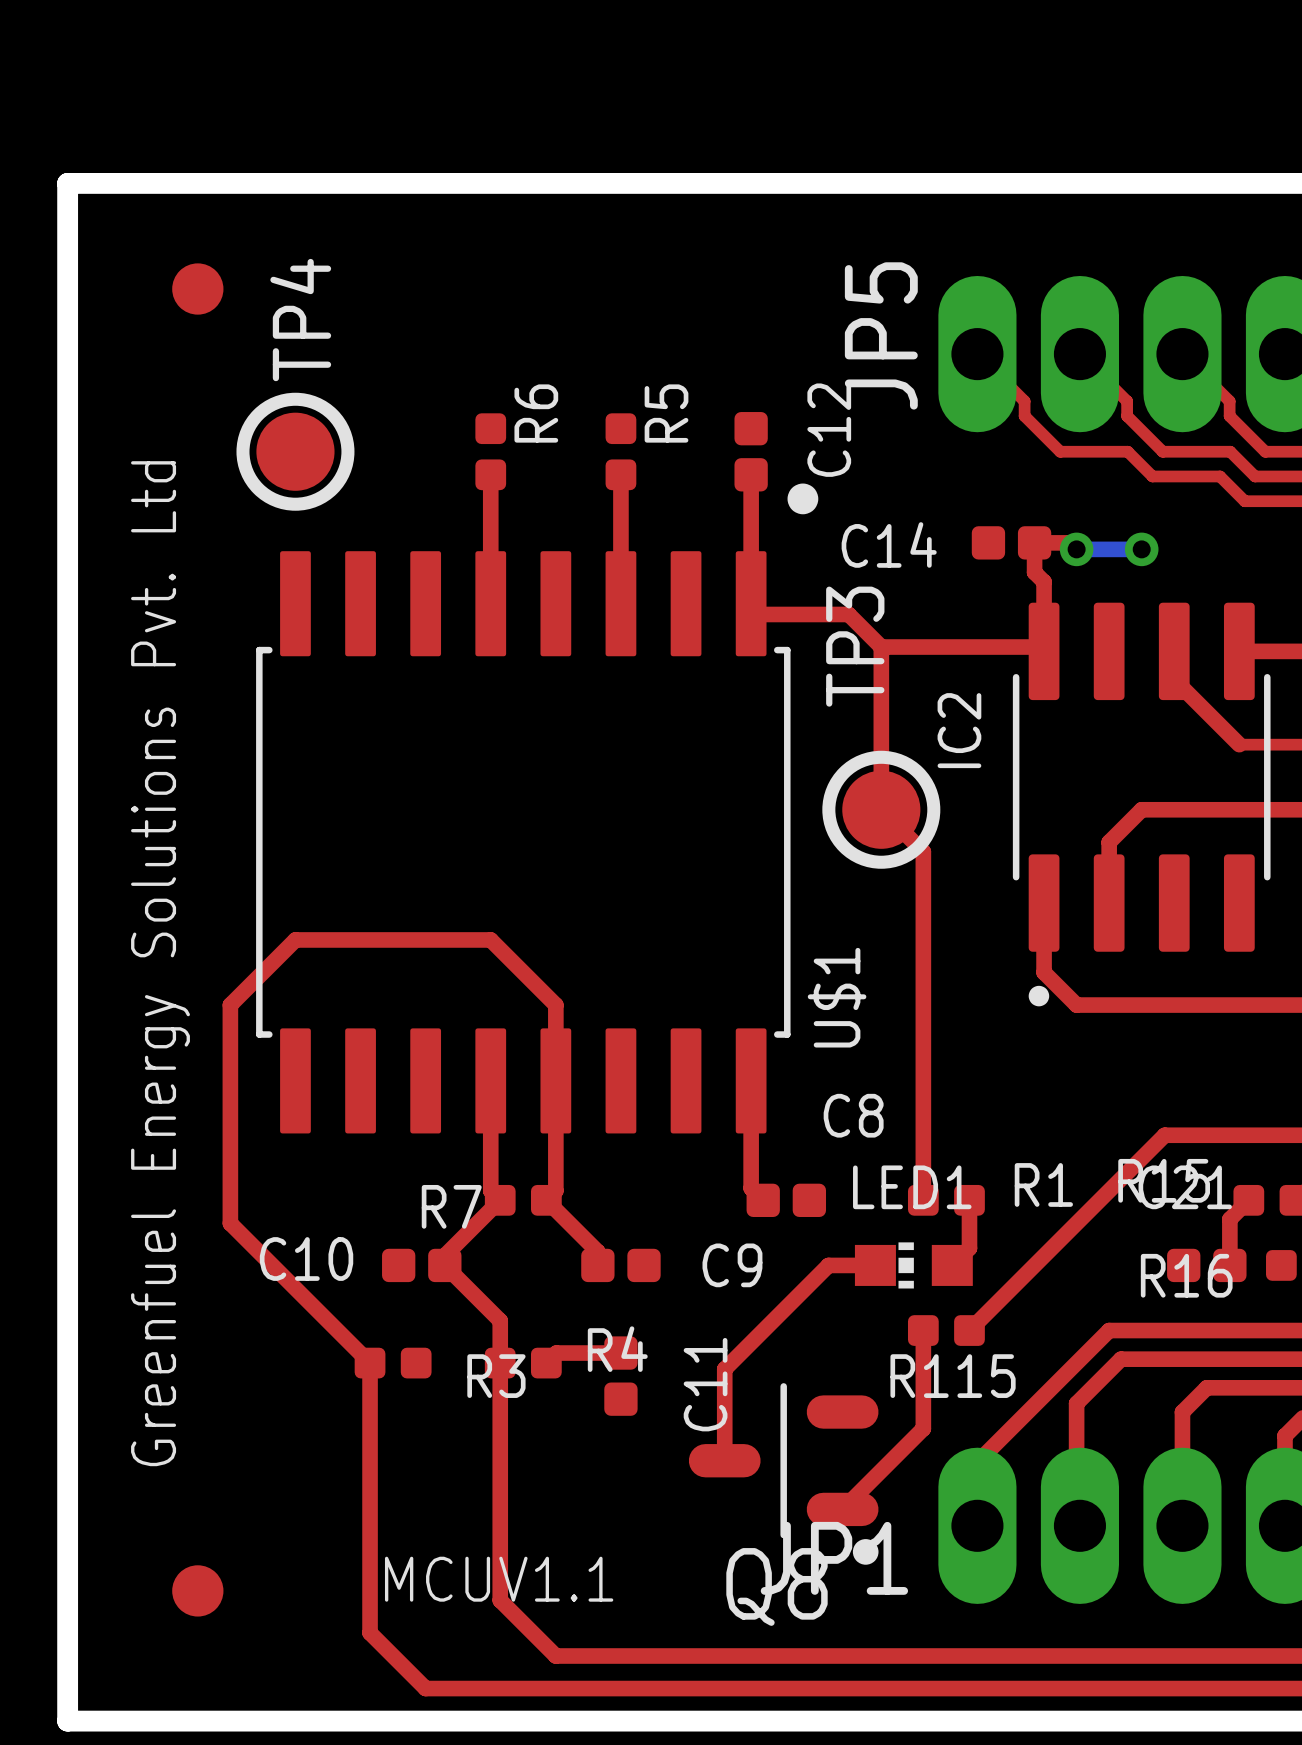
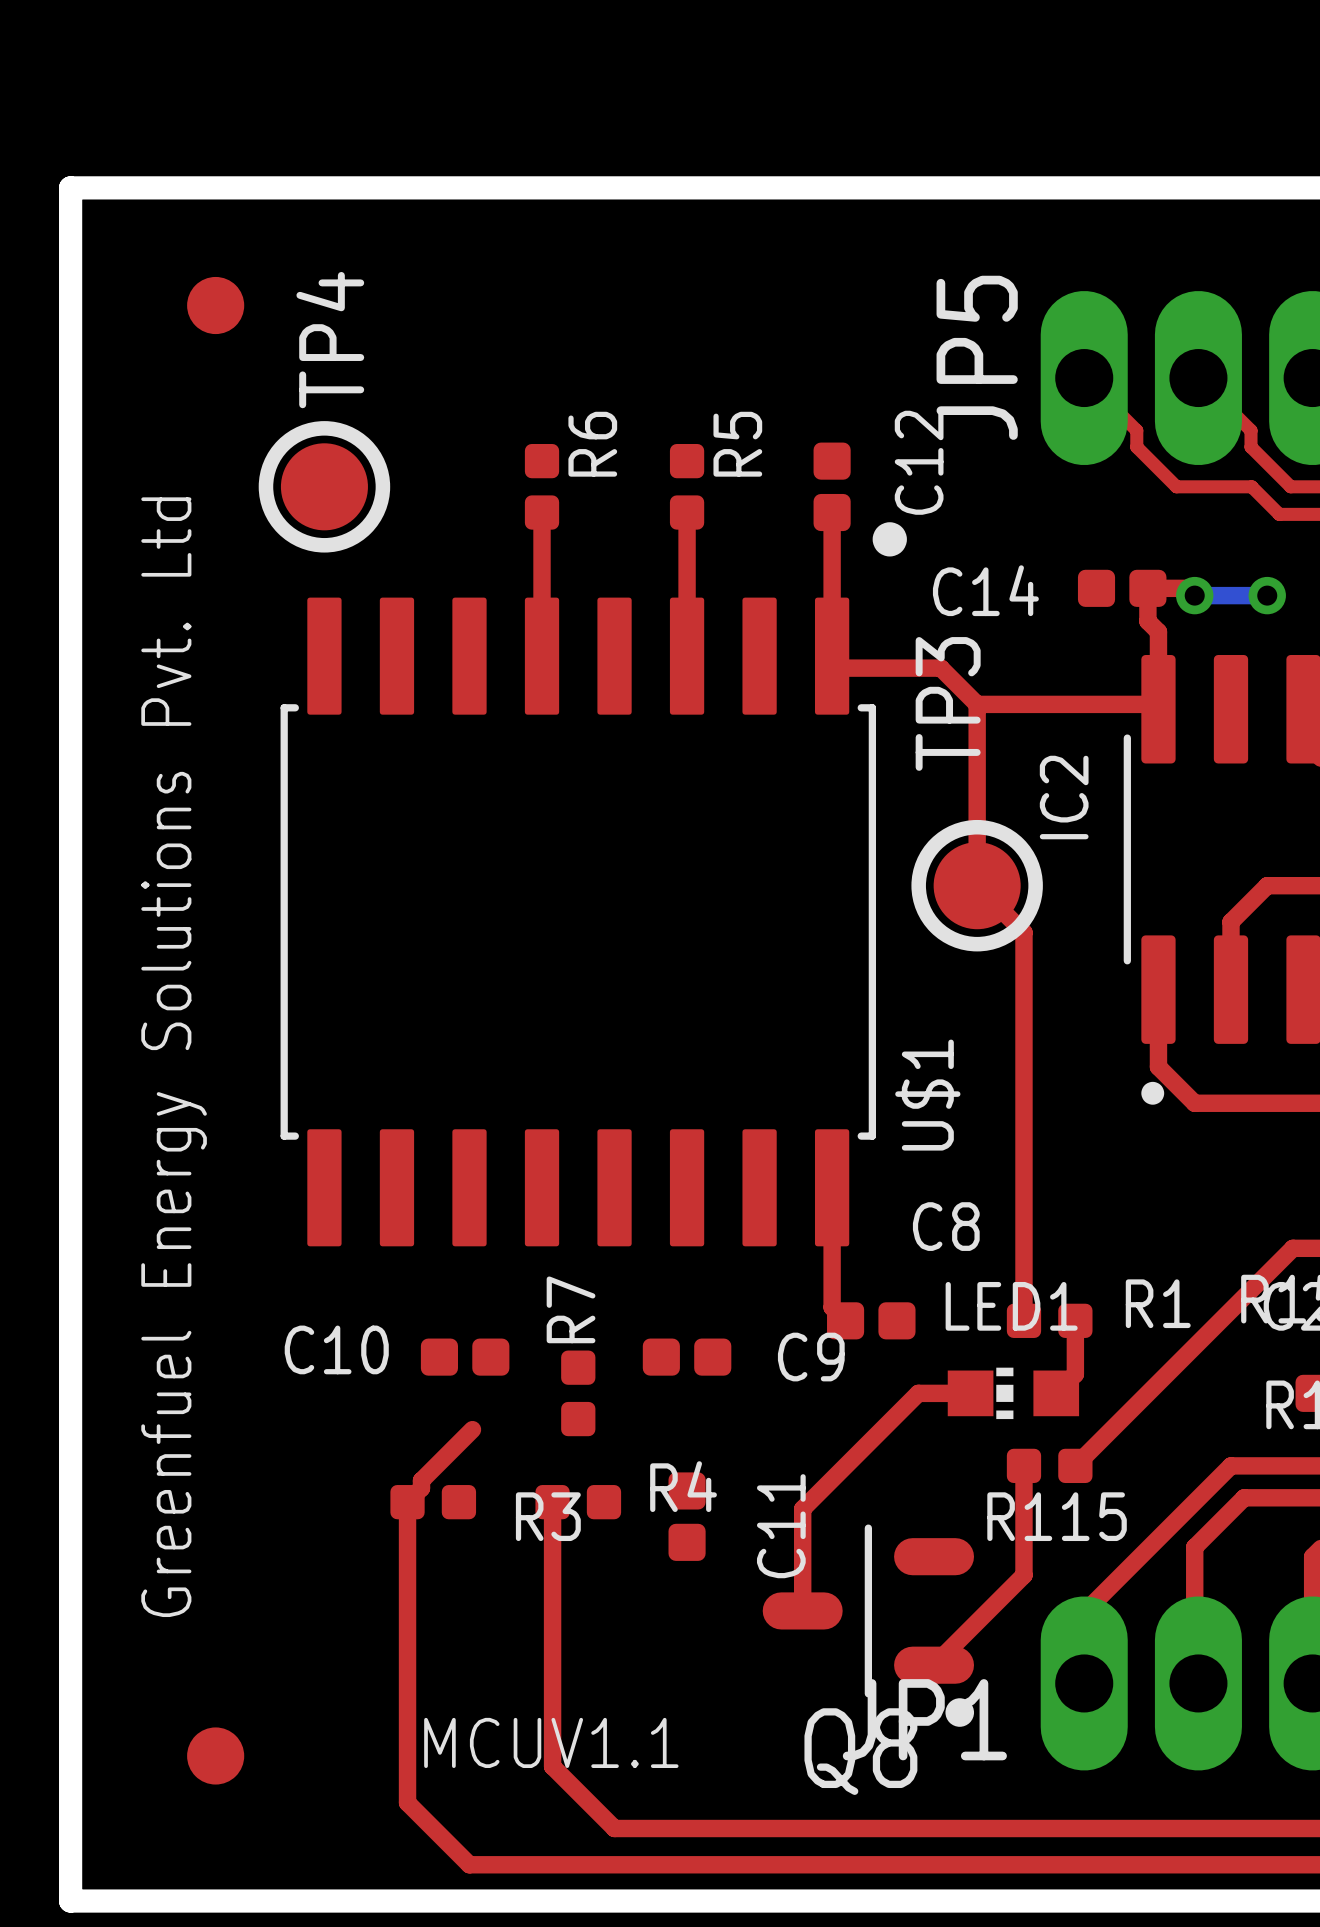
top track: (490, 1080) (490, 1190) (500, 1200) (444, 1255) (444, 1265) (500, 1320) (500, 1363) -> none
R7 rotation: 0° (523, 1200) -> 90° clockwise (578, 1393)
R7 position: (523, 1200) -> (578, 1393)
C10 position: (421, 1265) -> (465, 1357)
top track: (597, 1265) (597, 1251) (546, 1200) (555, 1190) (555, 1005) (490, 939) (295, 939) (230, 1005) (230, 1223) (370, 1363) -> (472, 1429) (421, 1480) (421, 1488) (407, 1502)
C9 position: (620, 1265) -> (687, 1357)
top track: (620, 1353) (556, 1353) (546, 1363) -> none

